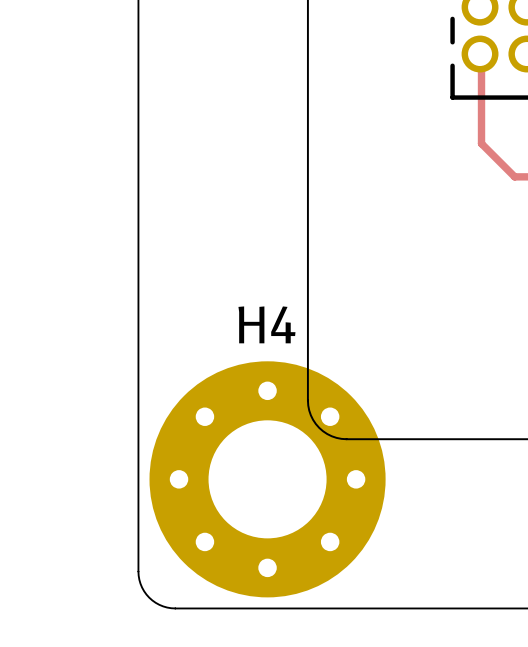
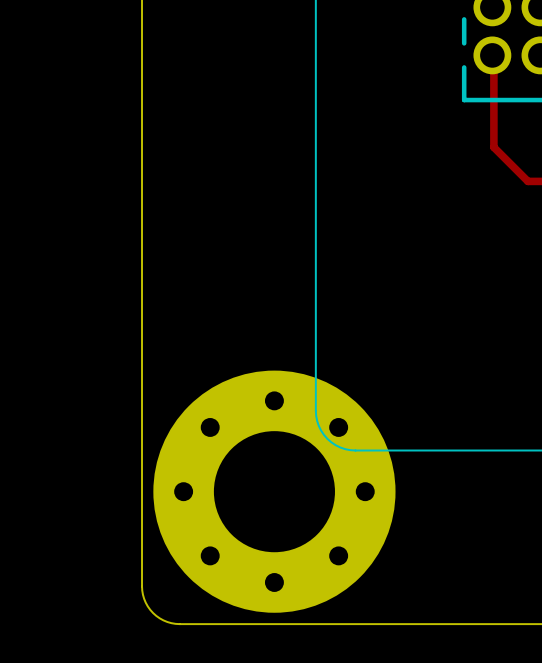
H4 name: H4 (266, 324) -> none

